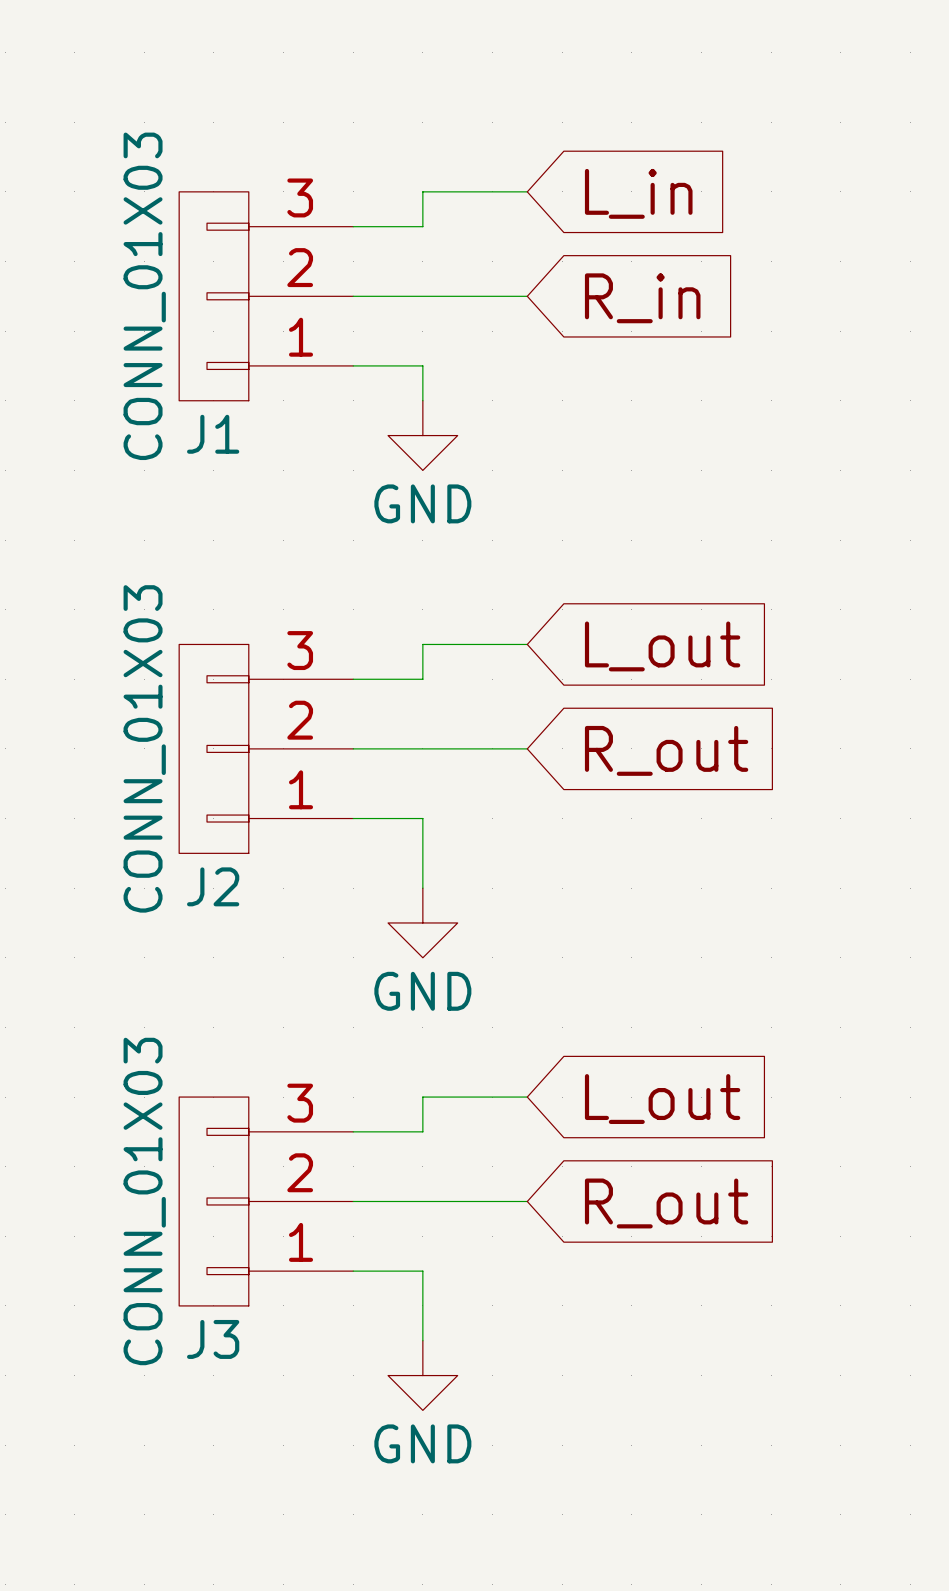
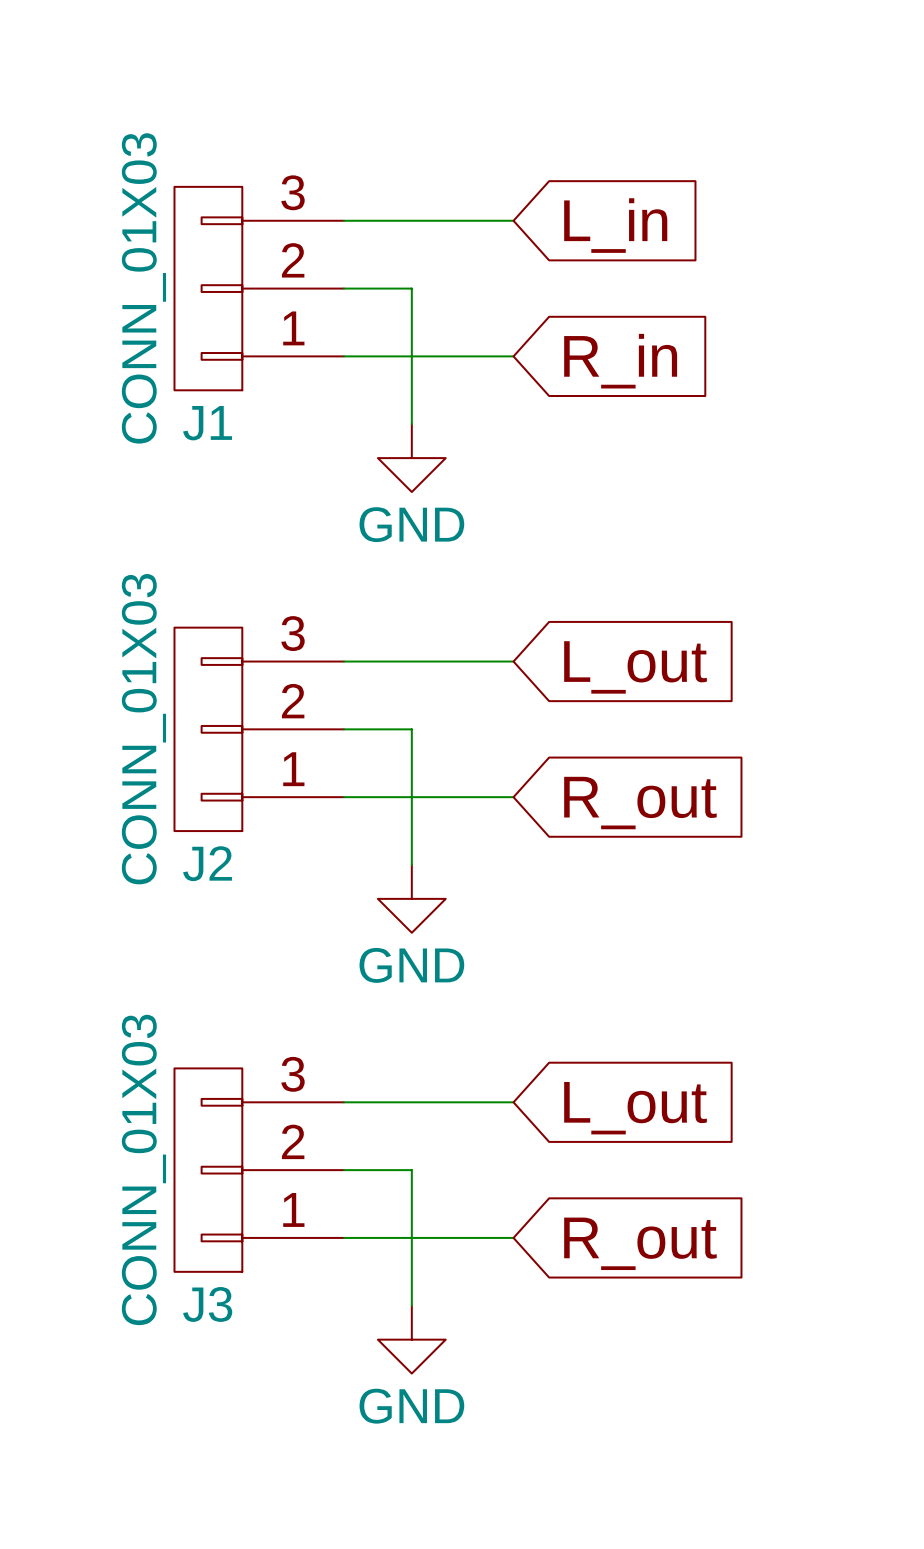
wire: (527, 191) (422, 191) (422, 226) -> (513, 220) (411, 220)
global label position: L_in (638, 193) -> L_in (615, 225)
wire: (422, 296) (527, 296) -> (411, 288) (411, 356) (513, 356)
global label position: R_in (642, 298) -> R_in (620, 361)
power symbol position: GND (422, 435) -> GND (411, 458)
wire: (527, 644) (422, 644) (422, 679) -> (513, 661) (411, 661)
global label position: L_out (662, 646) -> L_out (635, 667)
wire: (422, 748) (527, 748) -> (411, 729) (411, 797) (513, 797)
global label position: R_out (666, 750) -> R_out (640, 803)
wire: (527, 1097) (422, 1097) (422, 1131) -> (513, 1102) (411, 1102)
global label position: L_out (662, 1099) -> L_out (635, 1108)
wire: (422, 1201) (527, 1201) -> (411, 1170) (411, 1237) (513, 1237)
global label position: R_out (666, 1203) -> R_out (640, 1243)

